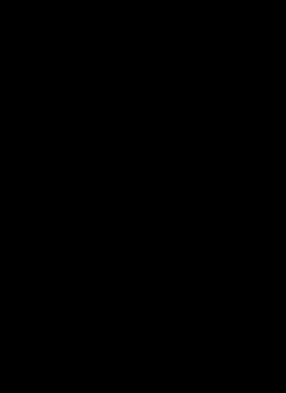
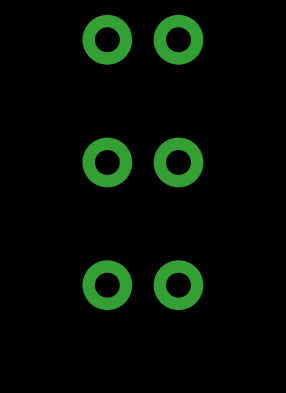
part: none -> (142, 39)
part: none -> (142, 162)
part: none -> (142, 285)

